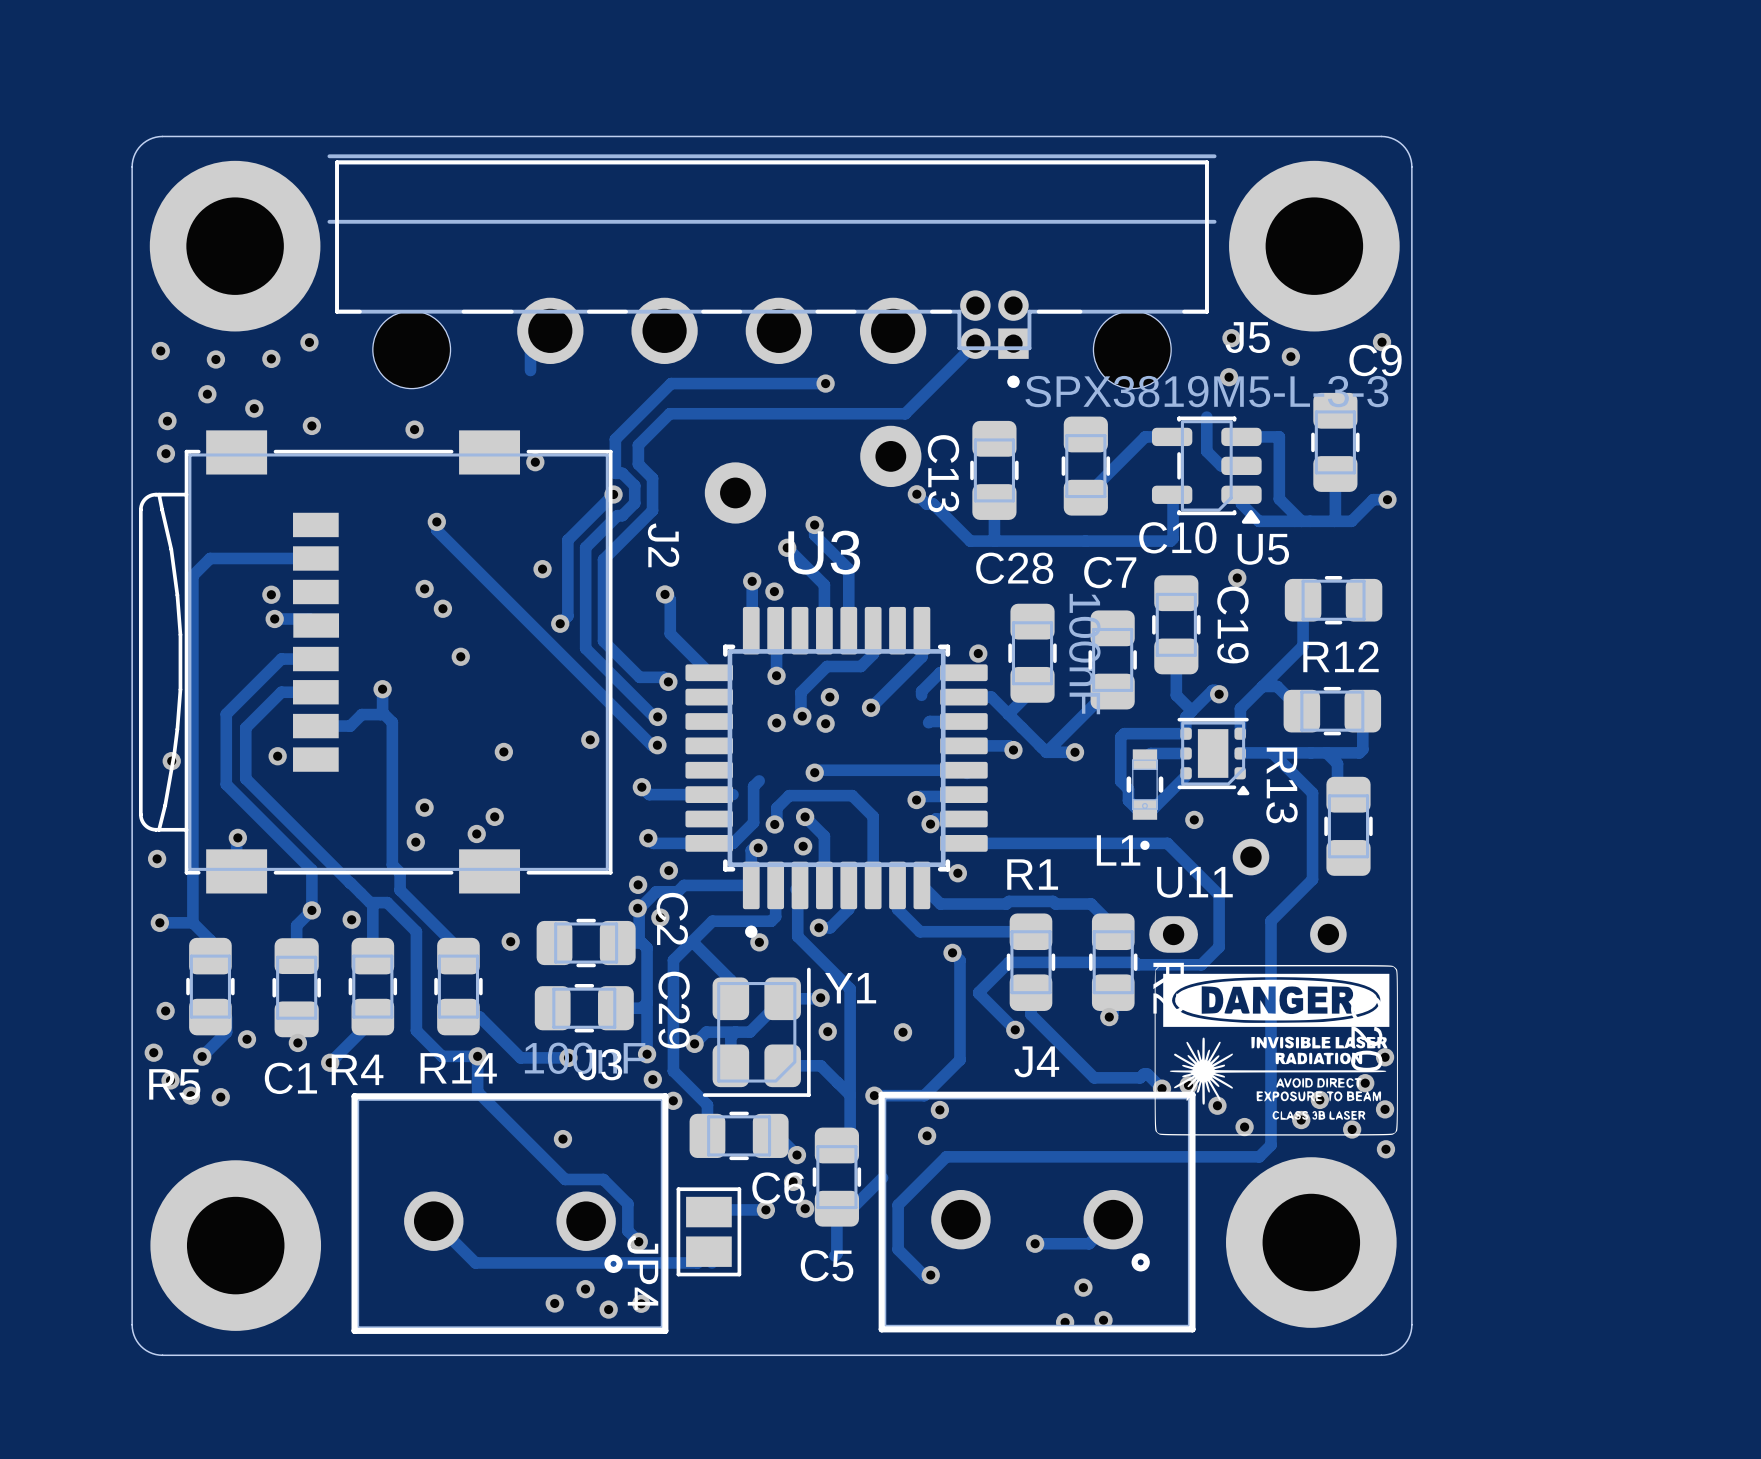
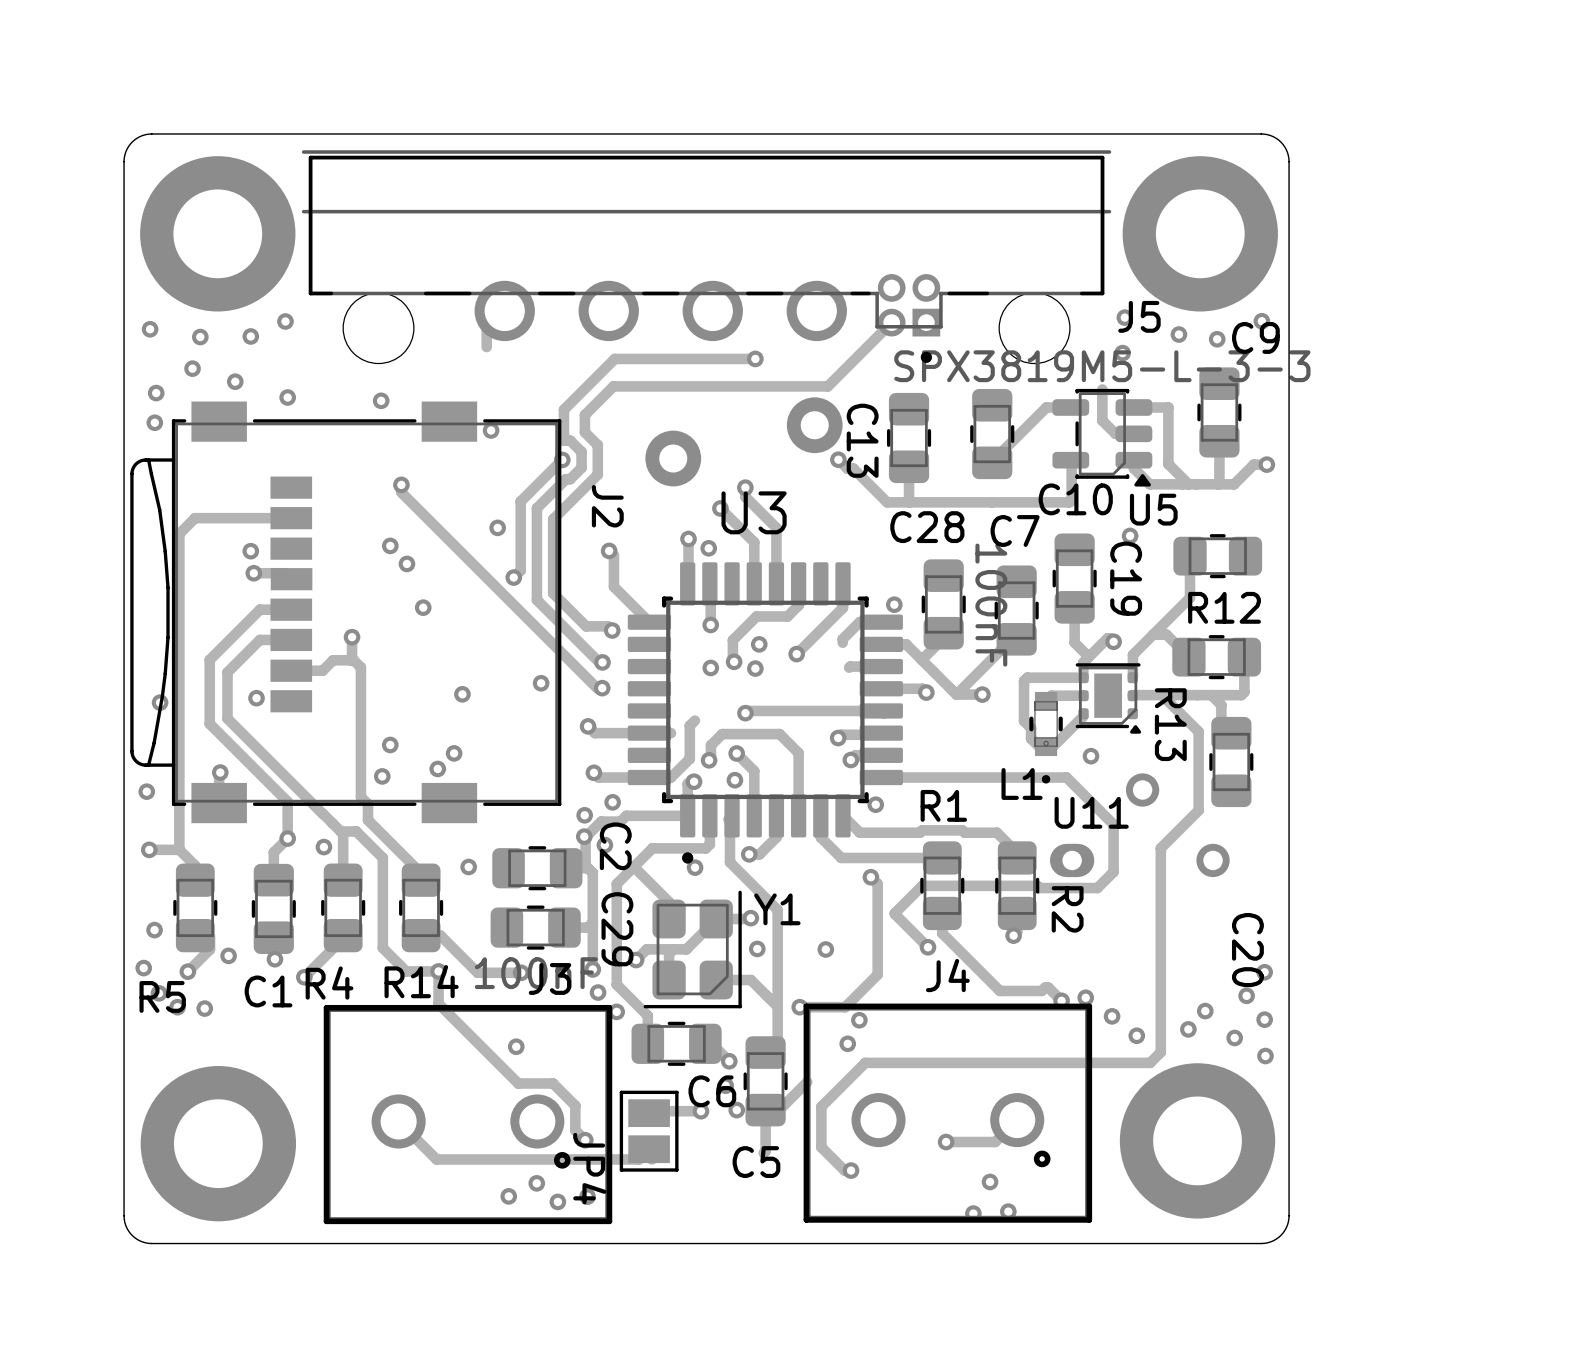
via: none -> (1217, 339)
drawing: [1154, 964, 1398, 1136] -> none

